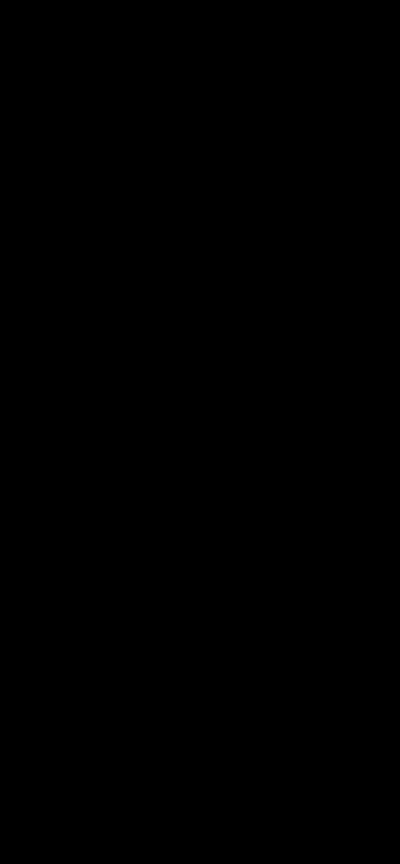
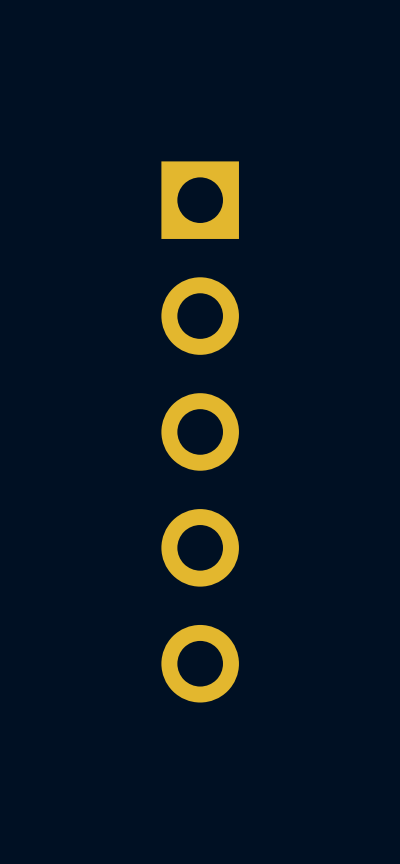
part: none -> (200, 431)

